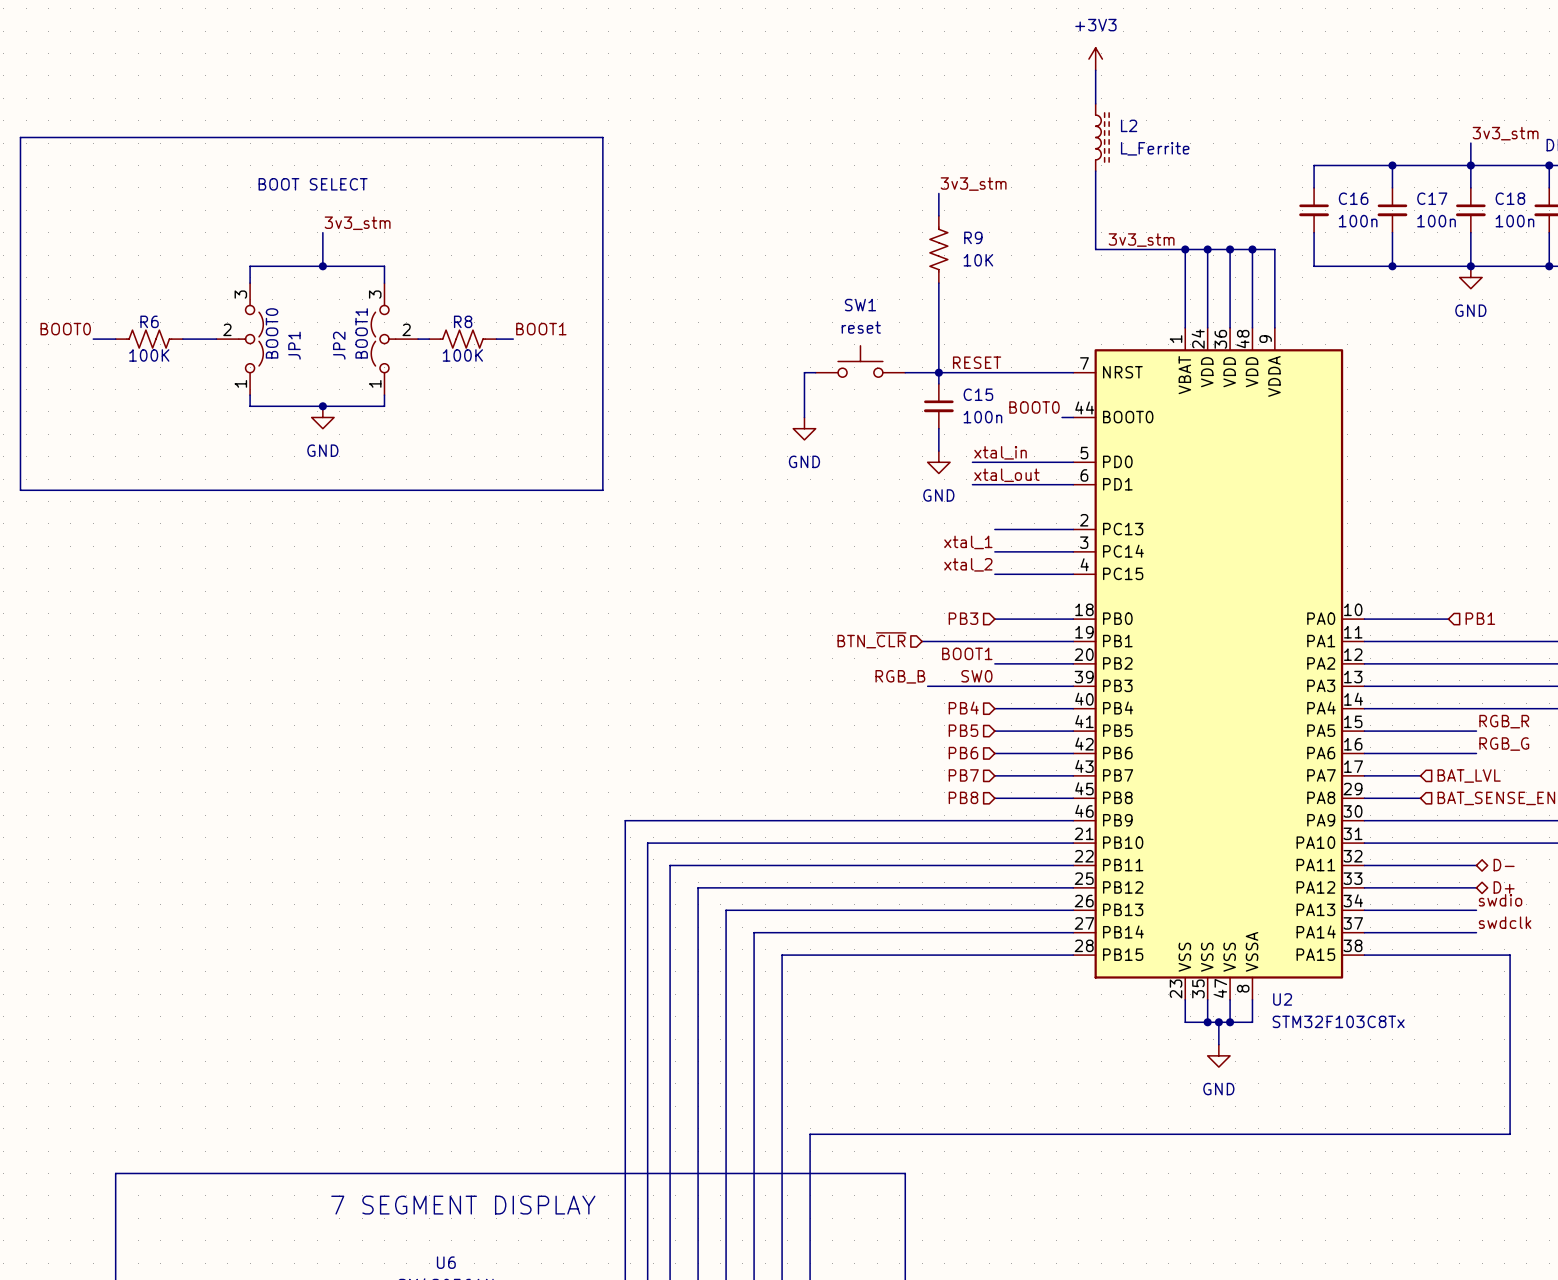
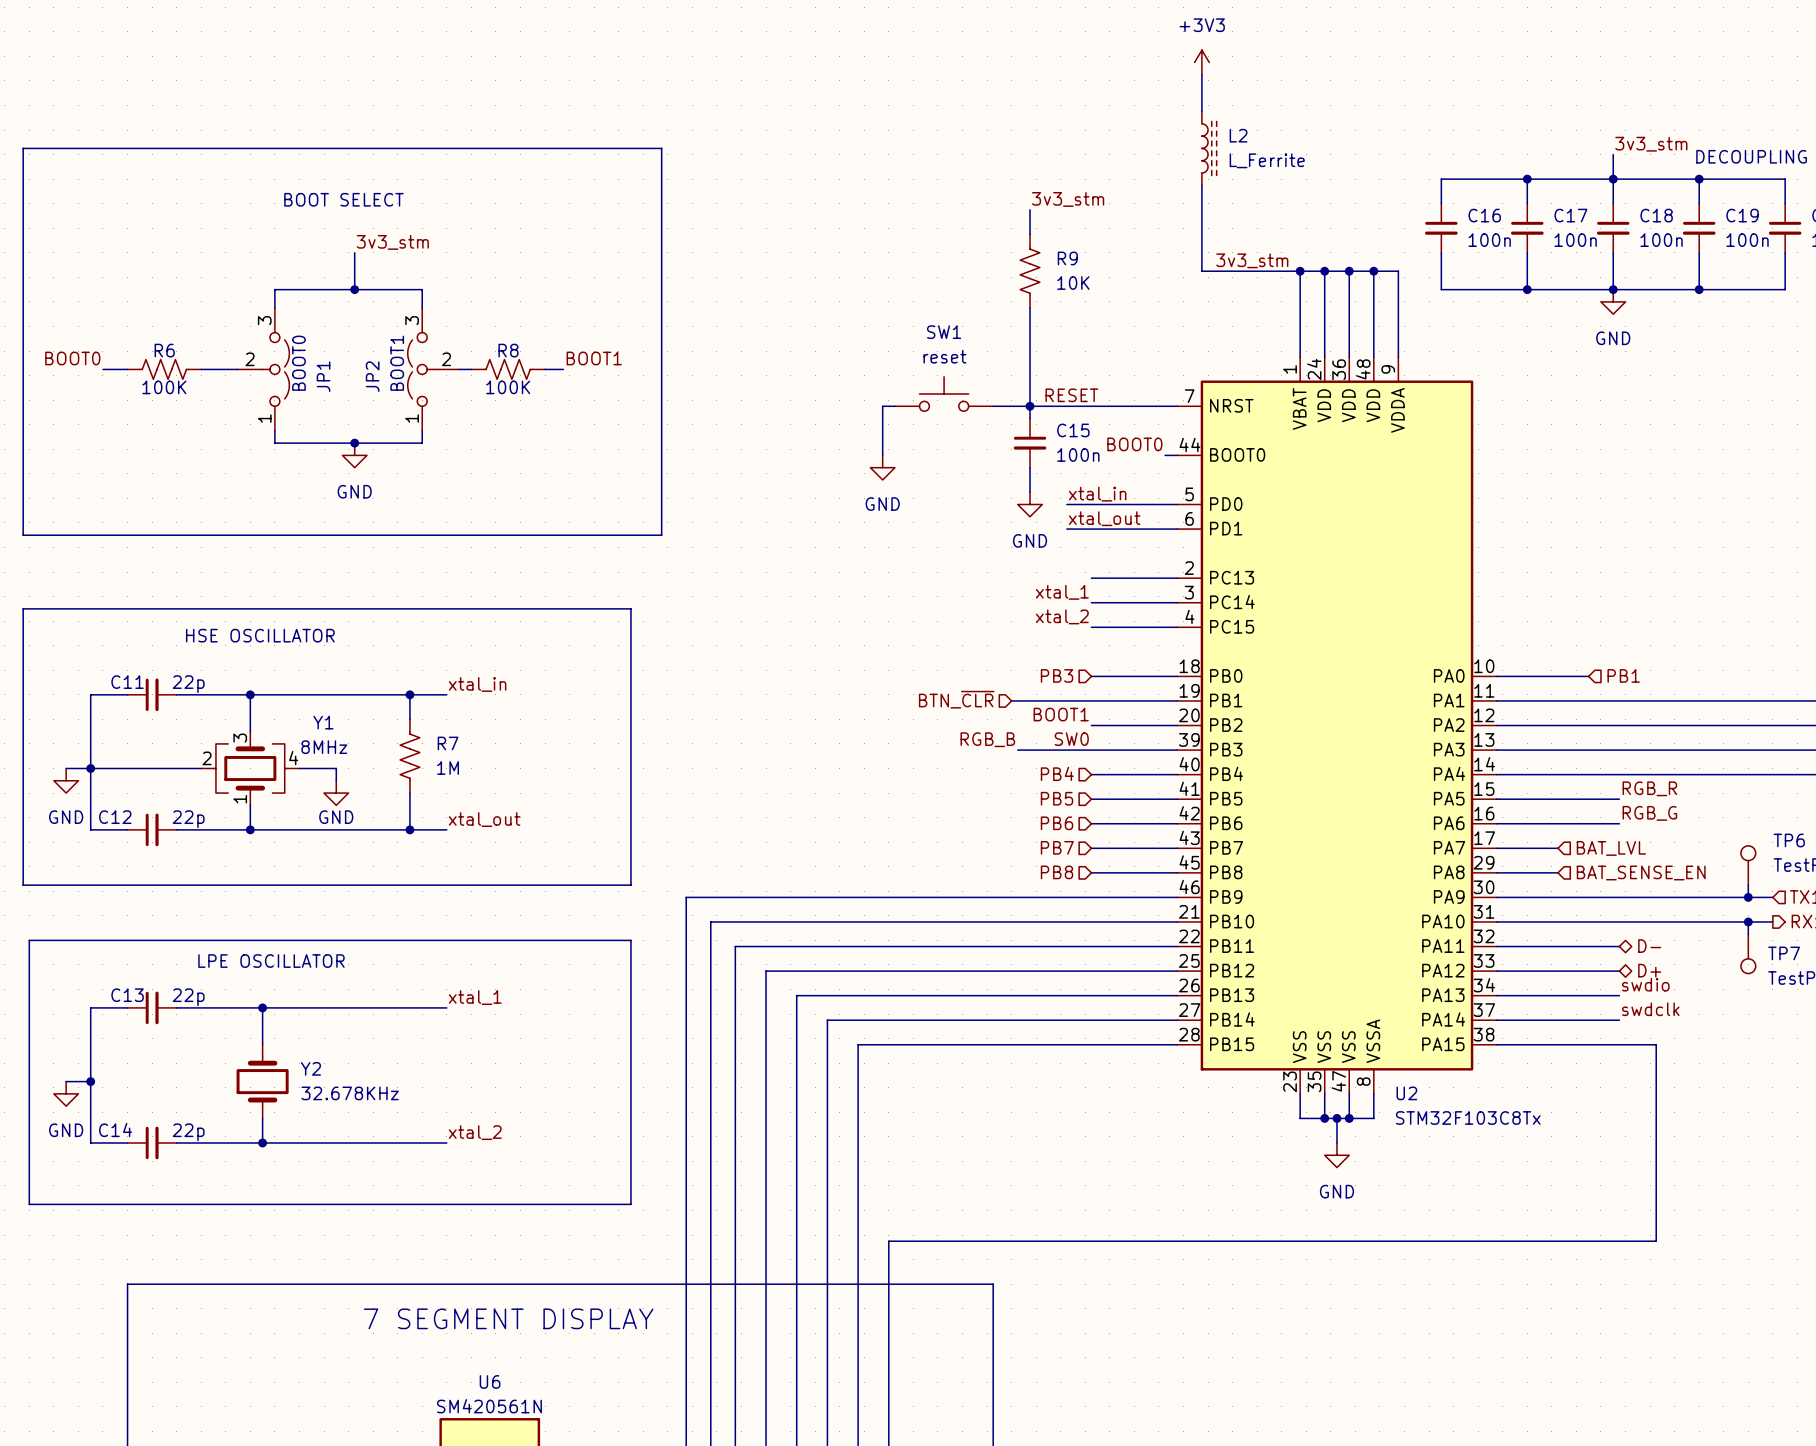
line: none -> (23, 608) (23, 885) (630, 885) (630, 608) (23, 608)
text: none -> HSE OSCILLATOR (260, 635)
label: none -> xtal_in (477, 684)
wire: none -> (127, 694) (90, 694) (90, 829) (127, 829)
C11: none -> 22p (152, 694)
wire: none -> (176, 694) (446, 694)
wire: none -> (250, 694) (250, 731)
junction: none -> (250, 694)
wire: none -> (409, 694) (409, 719)
junction: none -> (409, 694)
R7: none -> 1M (409, 756)
wire: none -> (66, 768) (201, 768)
junction: none -> (90, 768)
Y1: none -> 8MHz (250, 768)
wire: none -> (299, 768) (336, 768) (336, 780)
power symbol: none -> GND (66, 780)
power symbol: none -> GND (336, 793)
wire: none -> (409, 793) (409, 829)
wire: none -> (250, 805) (250, 829)
label: none -> xtal_out (484, 819)
C12: none -> 22p (152, 829)
wire: none -> (176, 829) (446, 829)
junction: none -> (250, 829)
junction: none -> (409, 829)
line: none -> (29, 940) (630, 940) (630, 1204) (29, 1204) (29, 940)
text: none -> LPE OSCILLATOR (271, 961)
label: none -> xtal_1 (475, 997)
wire: none -> (127, 1007) (90, 1007) (90, 1142) (127, 1142)
C13: none -> 22p (152, 1007)
wire: none -> (176, 1007) (446, 1007)
wire: none -> (262, 1007) (262, 1044)
junction: none -> (262, 1007)
wire: none -> (66, 1081) (90, 1081)
junction: none -> (90, 1081)
Y2: none -> 32.678KHz (262, 1081)
power symbol: none -> GND (66, 1093)
wire: none -> (262, 1118) (262, 1142)
label: none -> xtal_2 (475, 1132)
C14: none -> 22p (152, 1142)
wire: none -> (176, 1142) (446, 1142)
junction: none -> (262, 1142)

